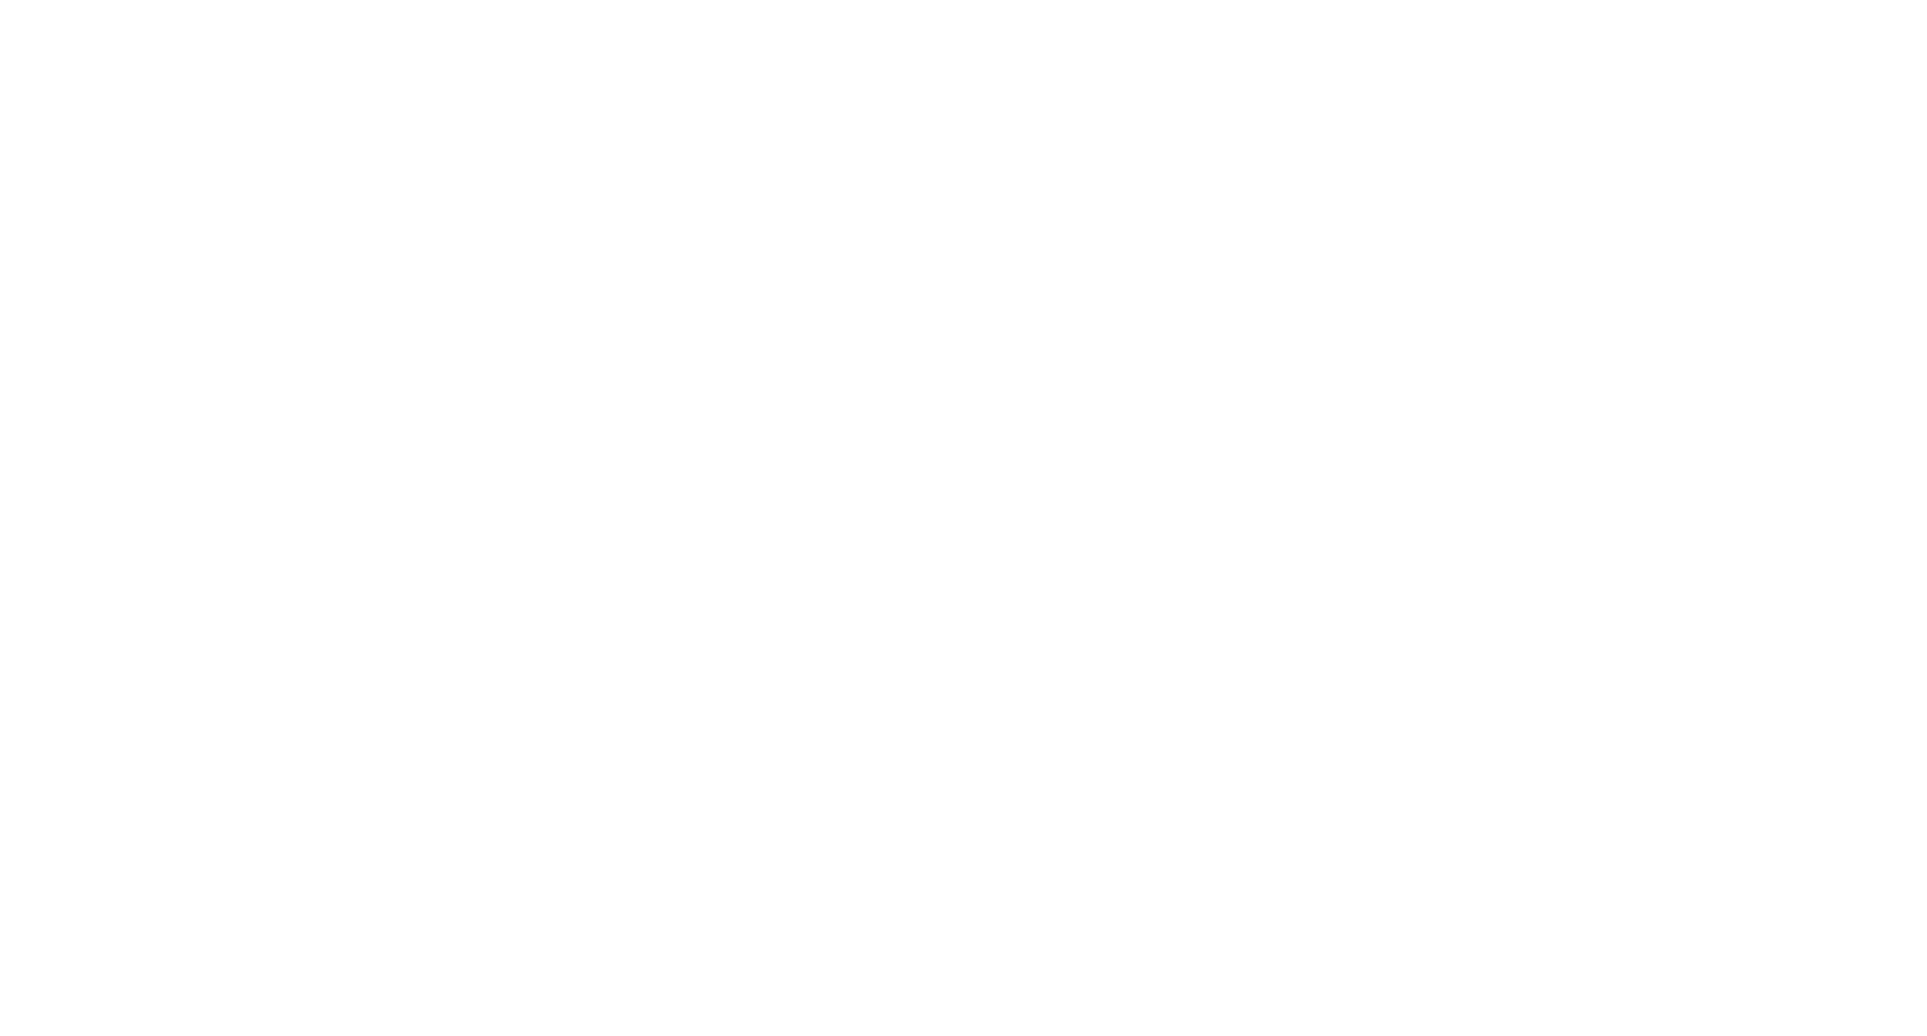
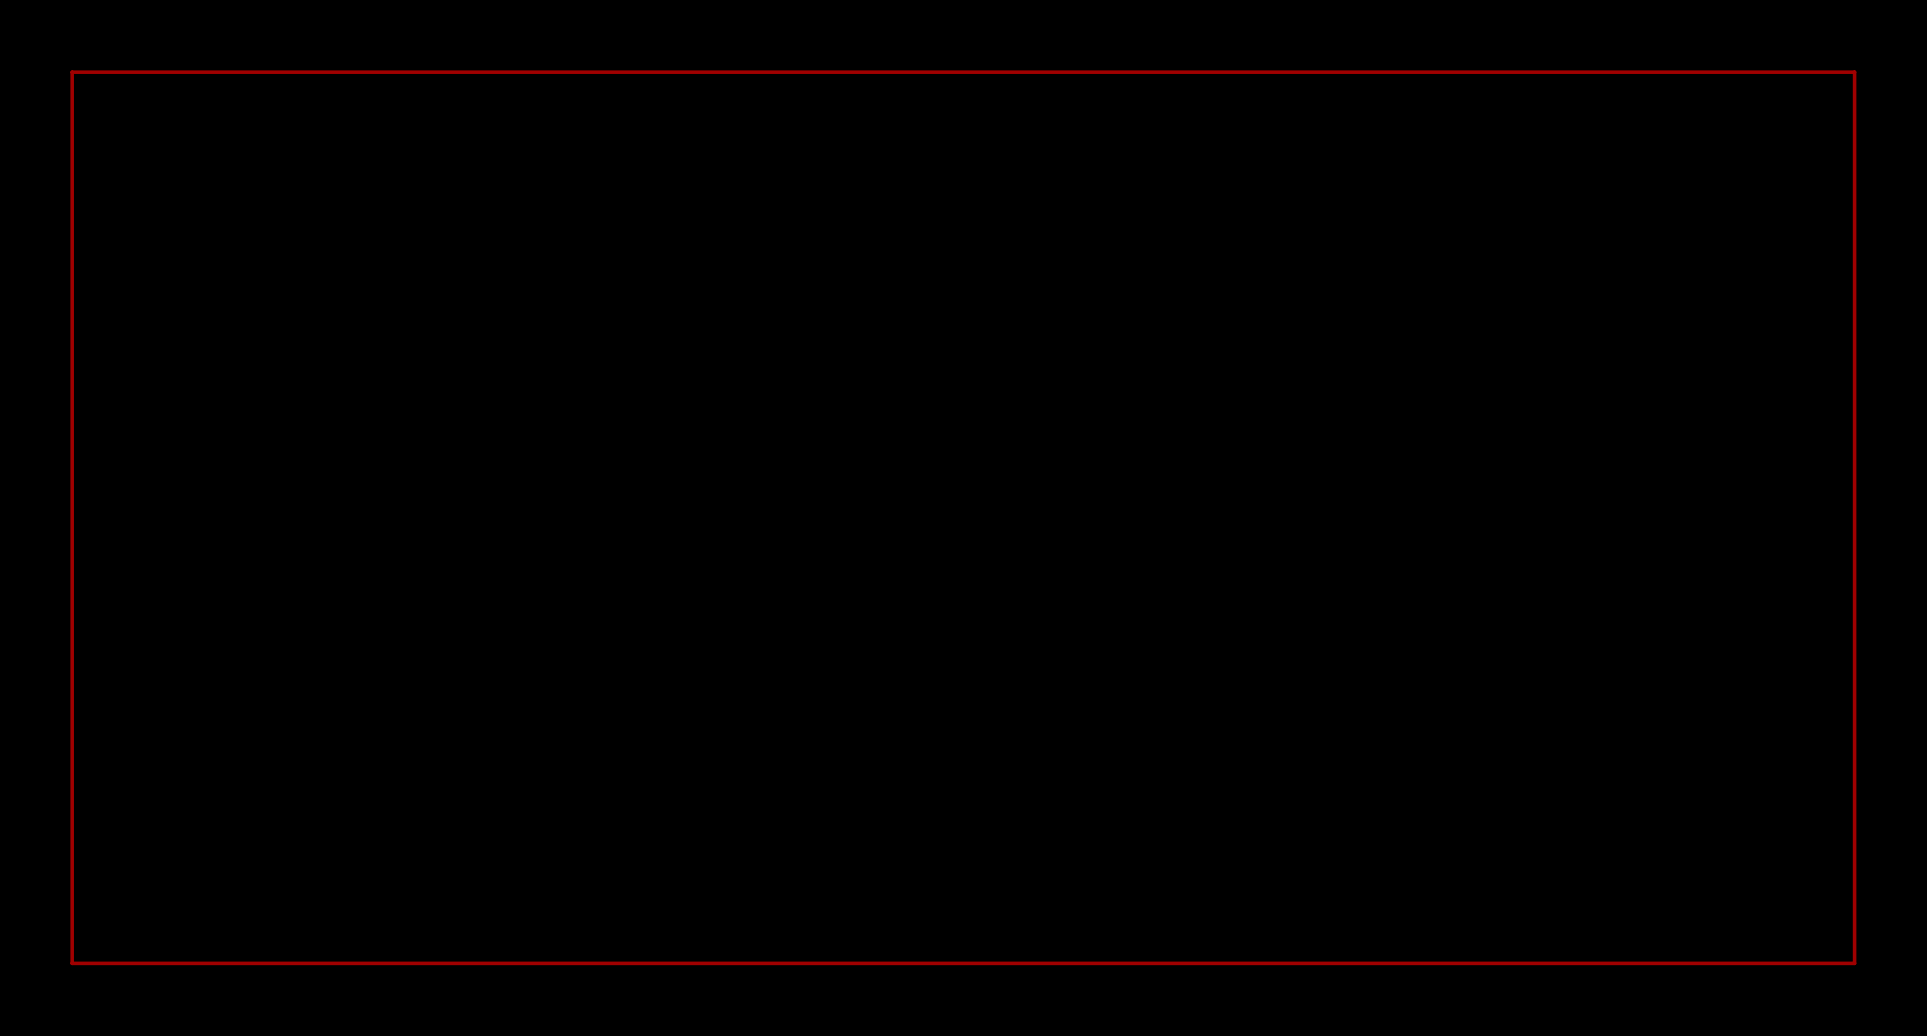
top track: none -> (72, 72) (1854, 72) (1854, 963) (72, 963) (72, 72)

